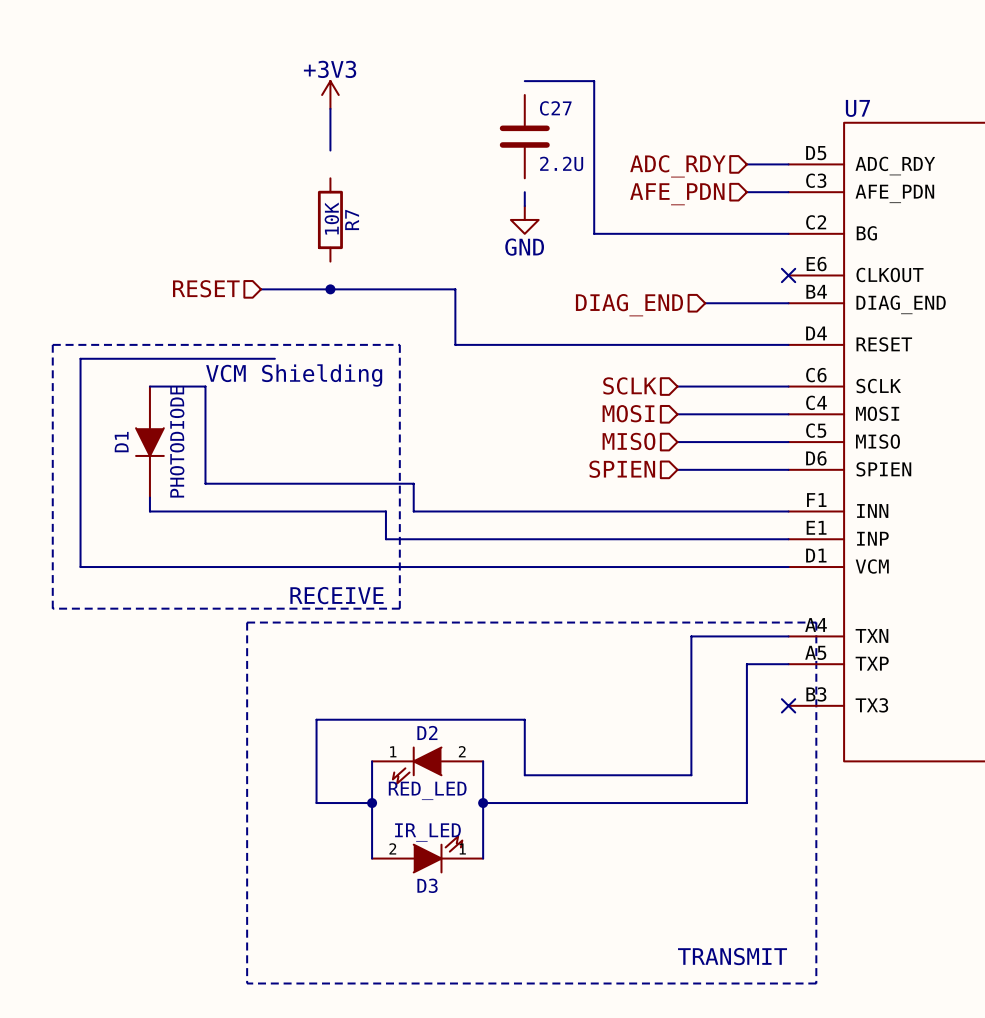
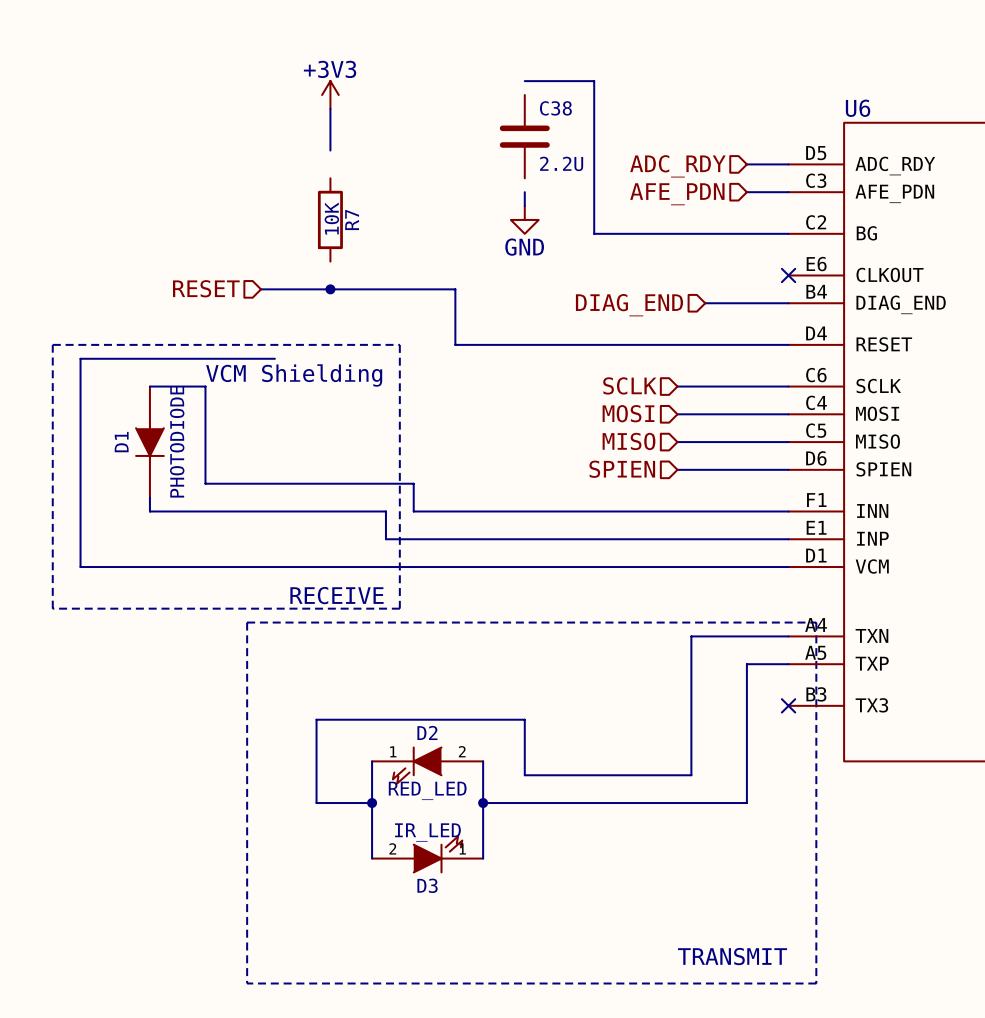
C27 name: C27 (555, 108) -> C38 (555, 108)
U7 name: U7 (857, 108) -> U6 (858, 108)

